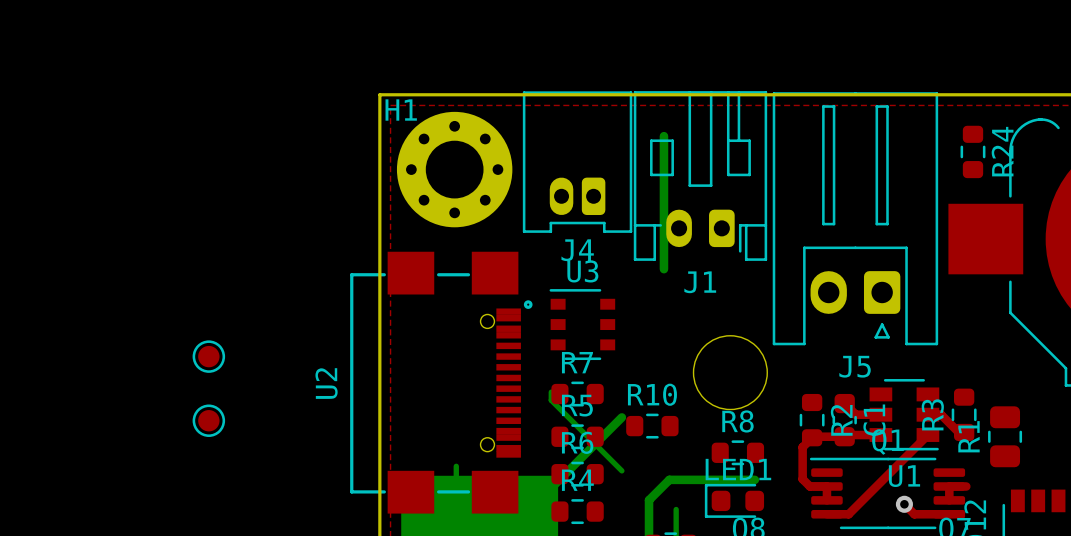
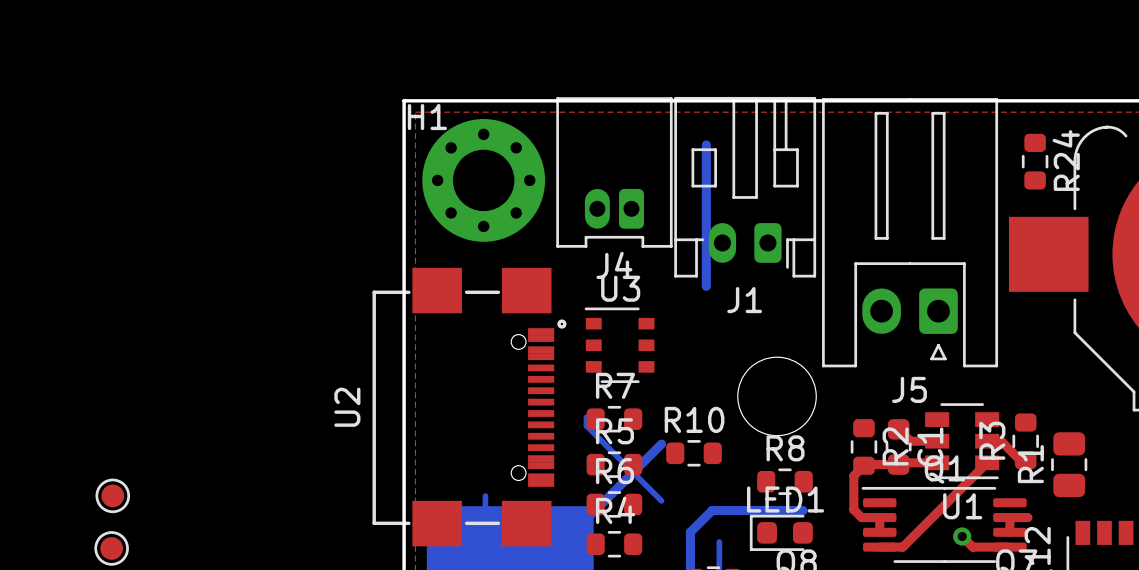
part: (208, 356) -> none
part: (208, 420) -> none
part: none -> (112, 495)
part: none -> (111, 548)

